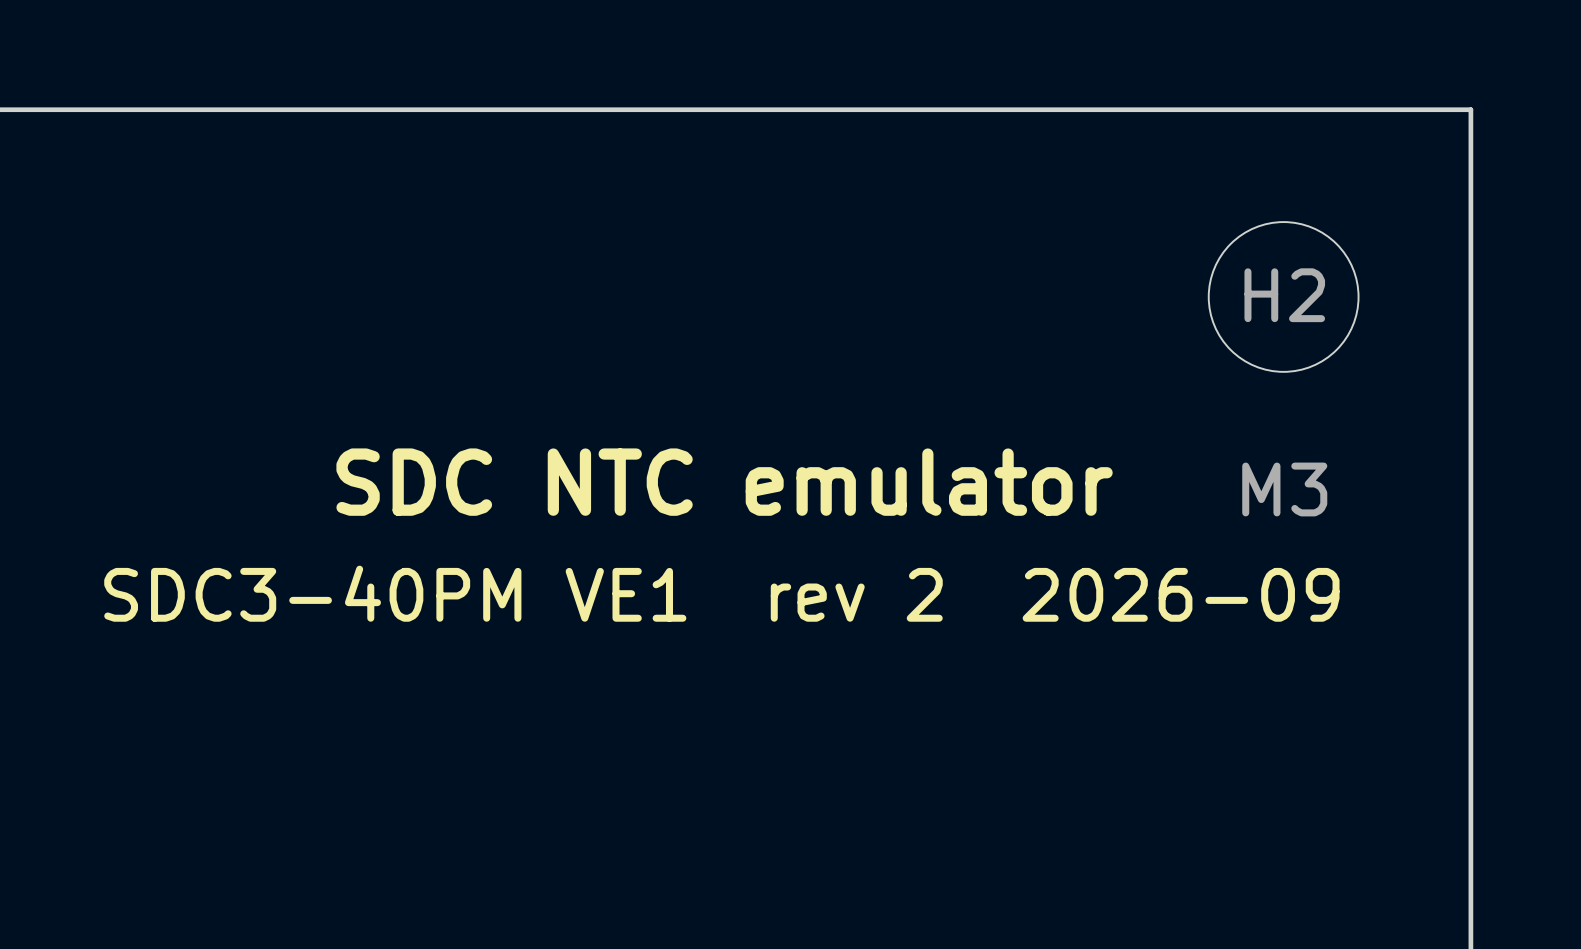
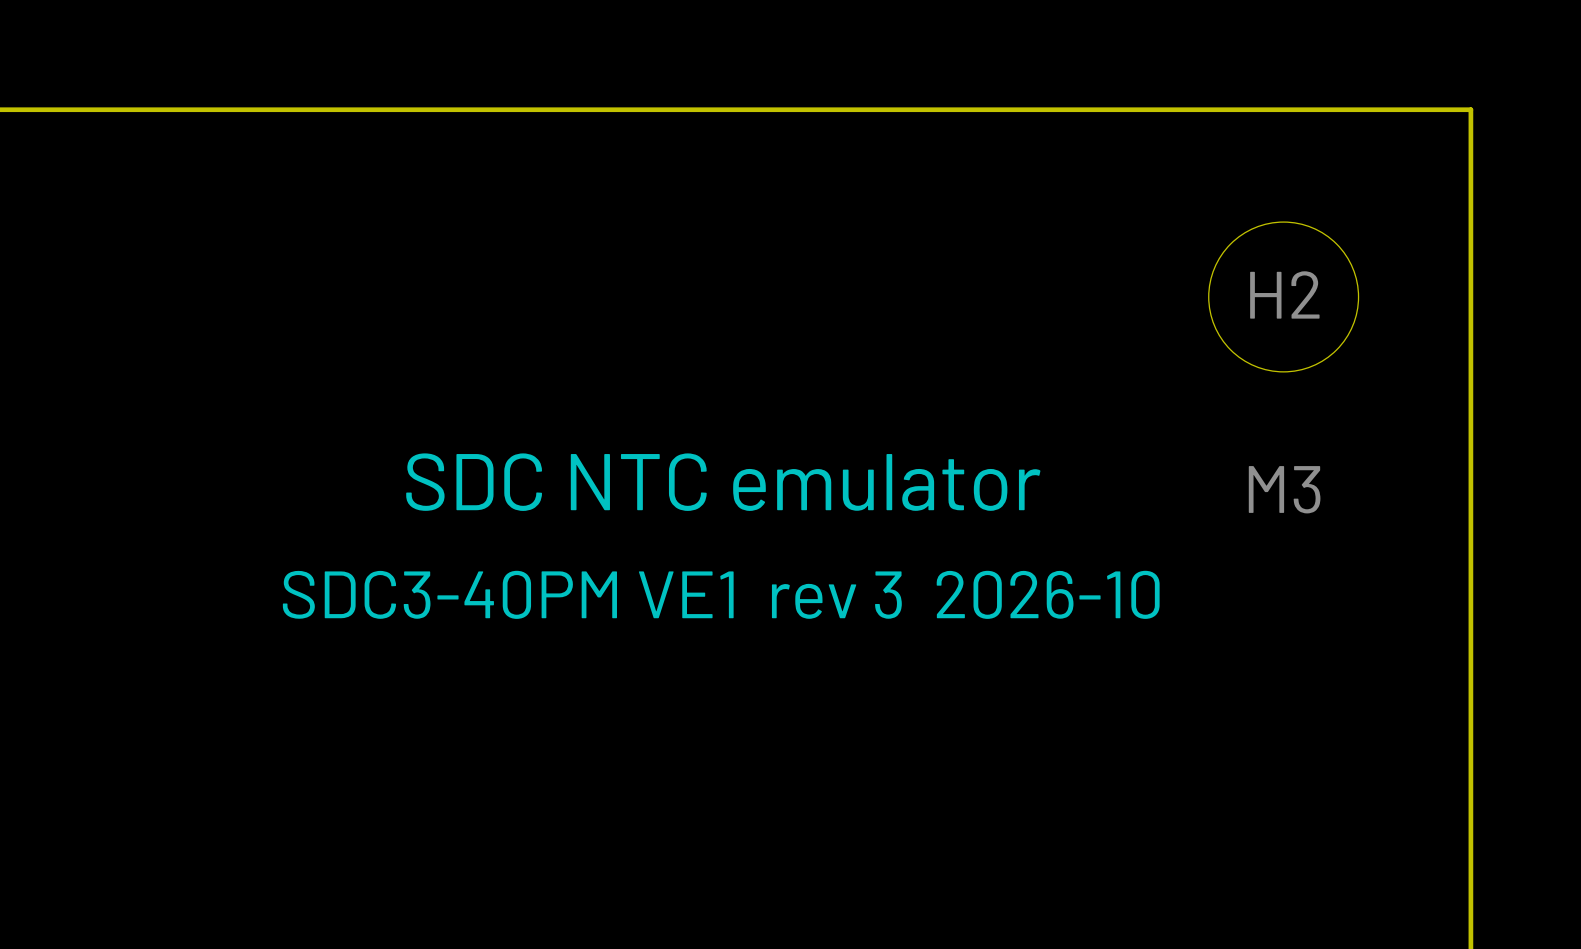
text: SDC3-40PM VE1 rev 2 2026-09 (721, 593) -> SDC3-40PM VE1 rev 3 2026-10 (721, 594)

